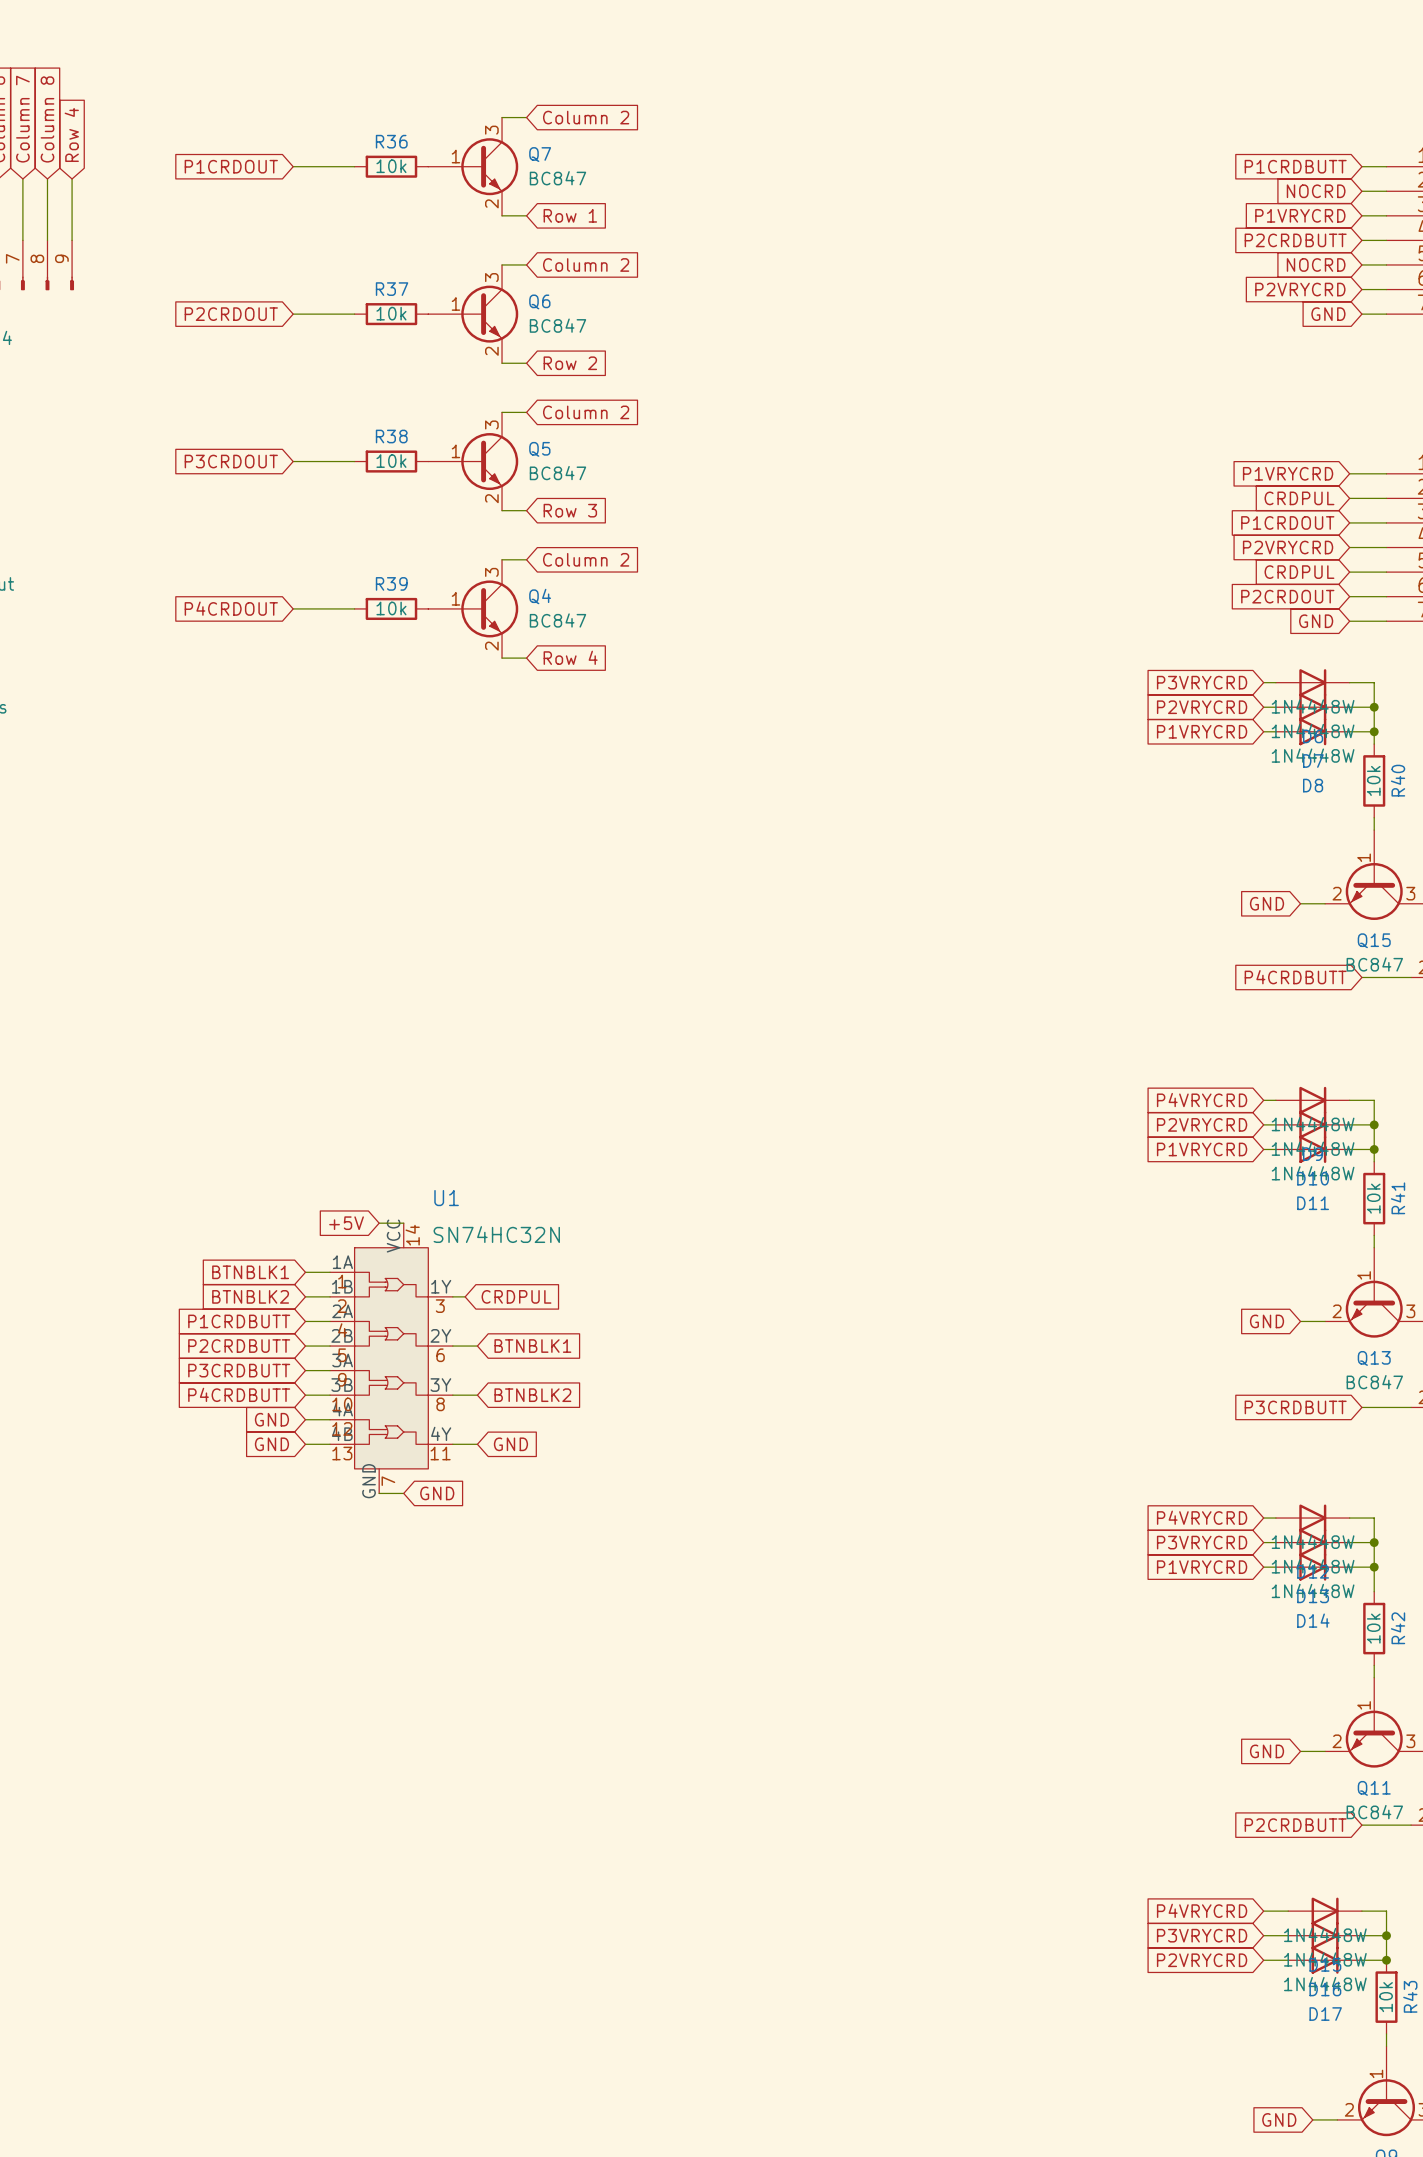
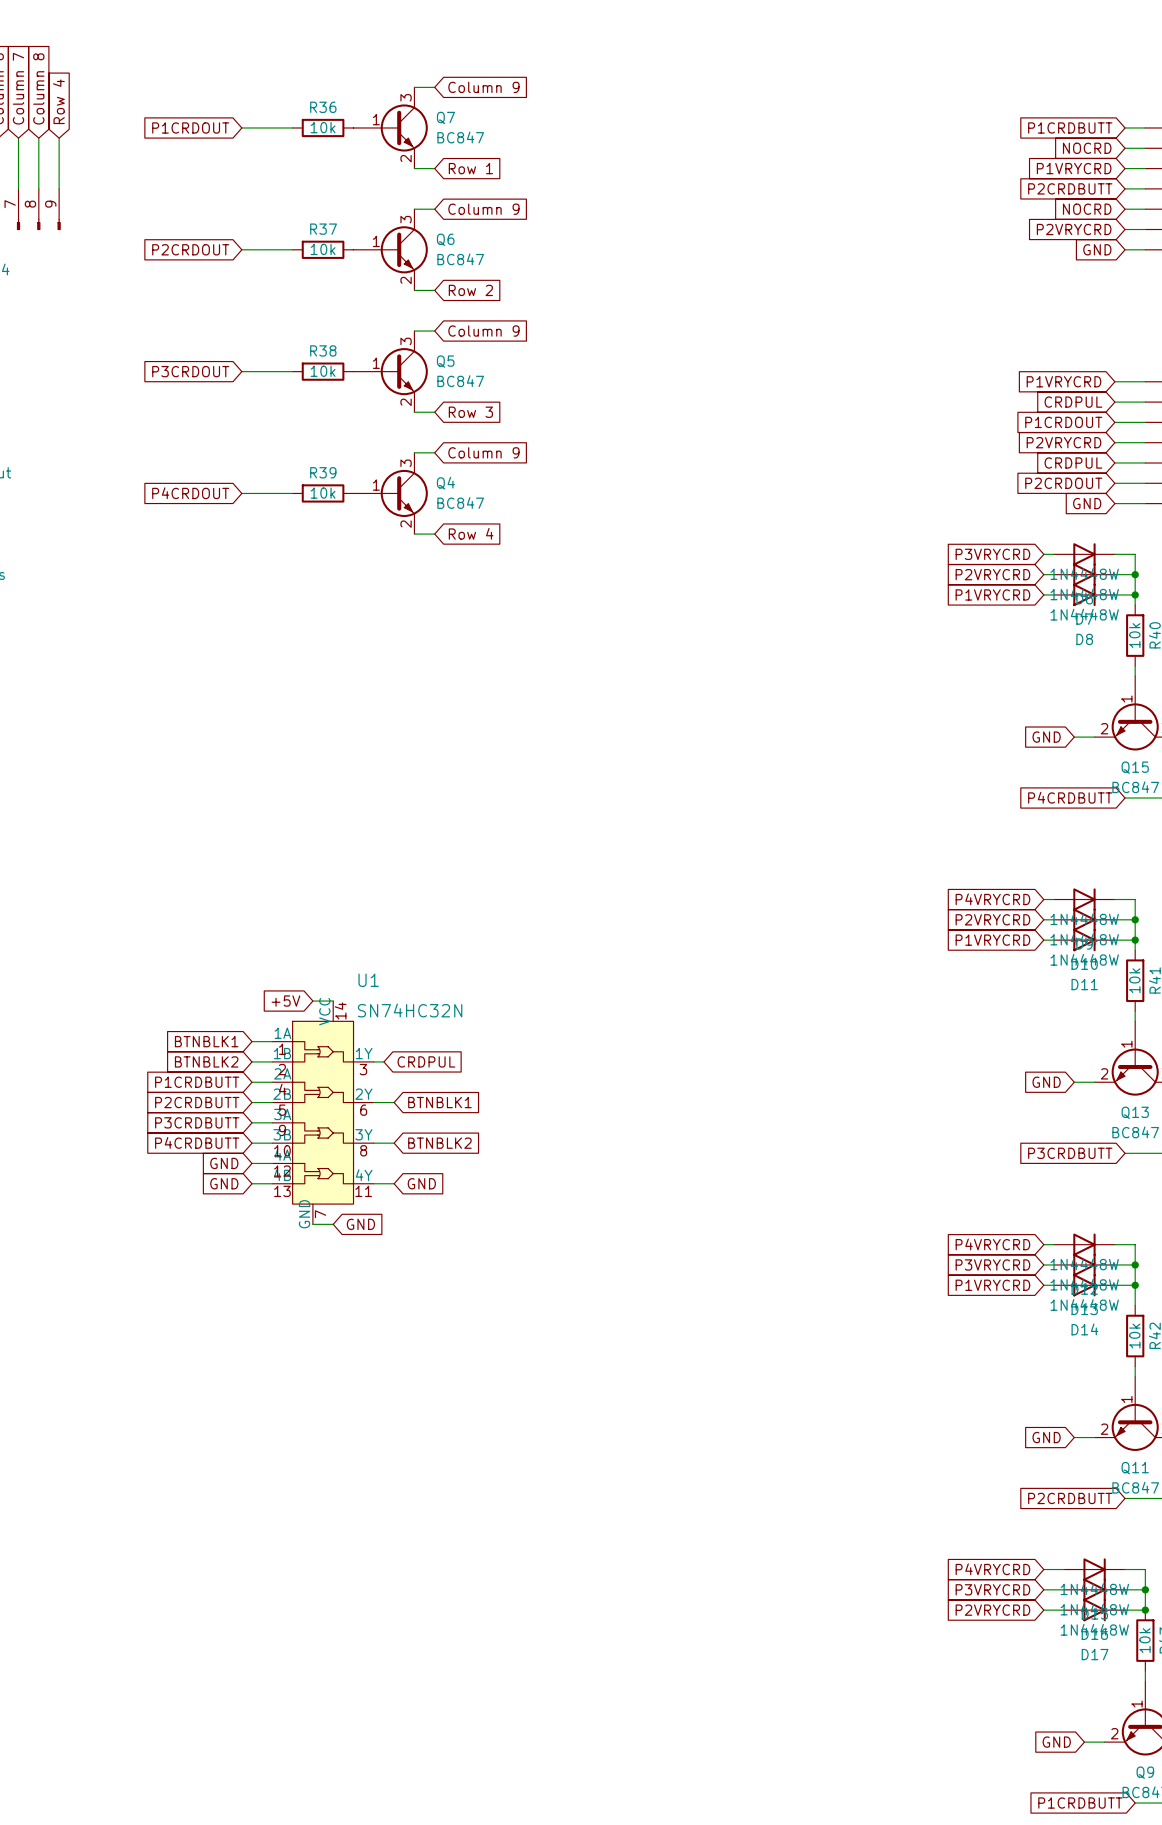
global label: Column 2 (586, 117) -> Column 9 (483, 87)
global label: Column 2 (586, 264) -> Column 9 (483, 209)
global label: Column 2 (586, 412) -> Column 9 (483, 331)
global label: Column 2 (586, 559) -> Column 9 (483, 452)

